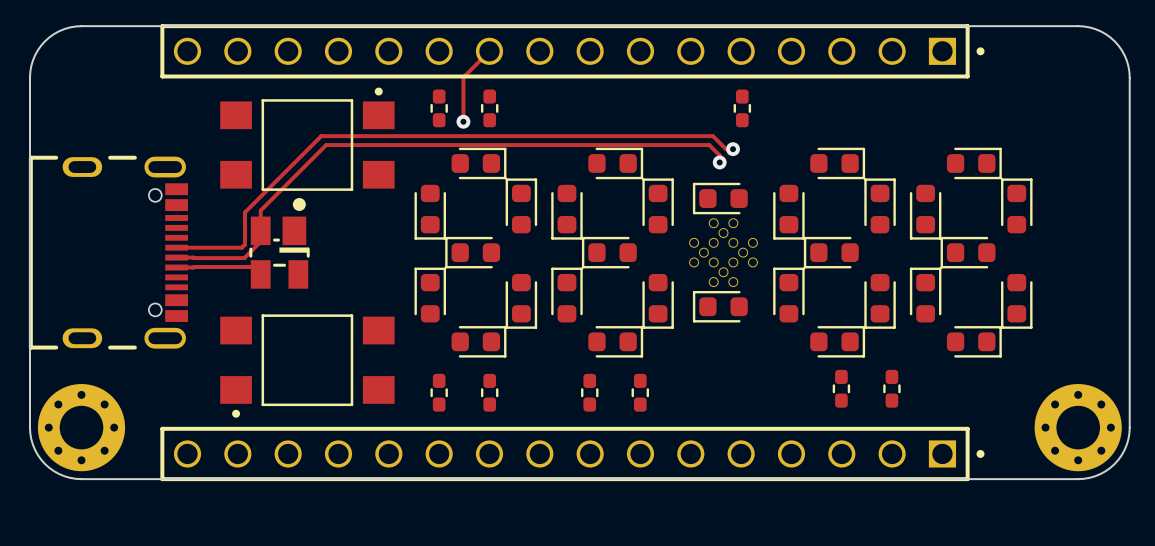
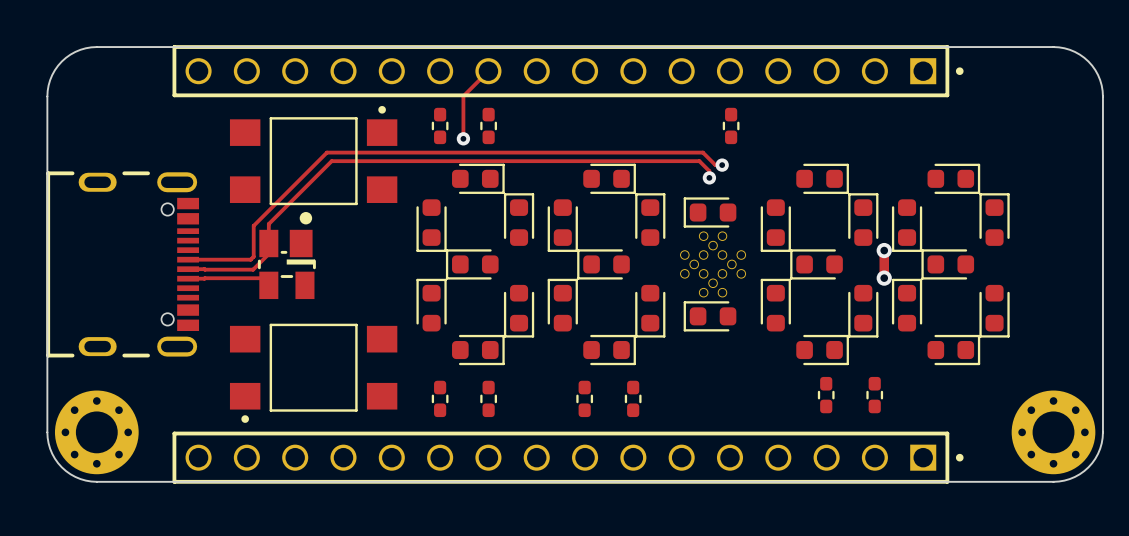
track: none -> (884, 250) (884, 278)
via: none -> (884, 250)
via: none -> (884, 278)

